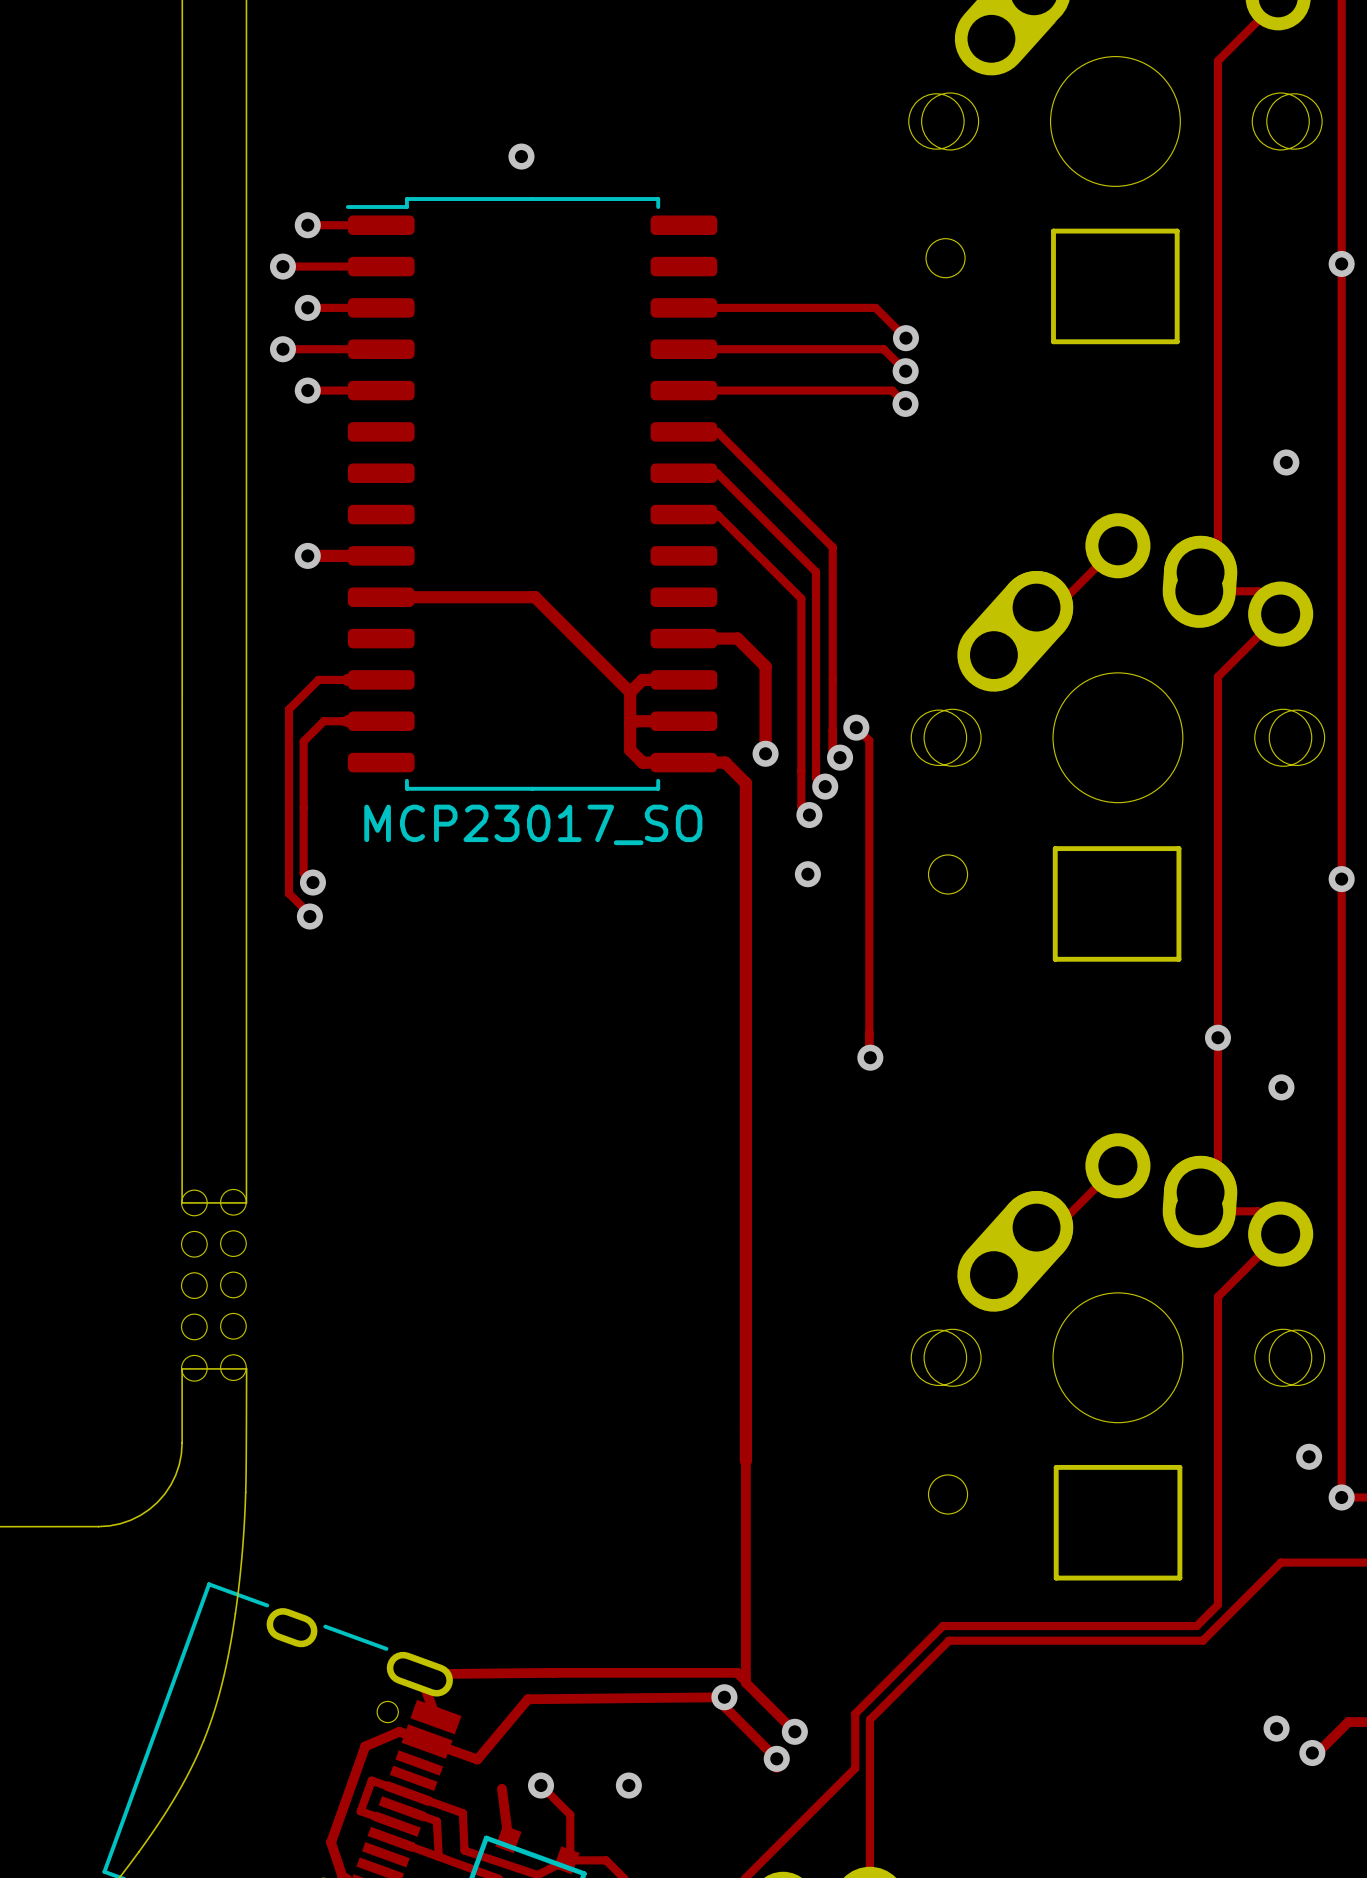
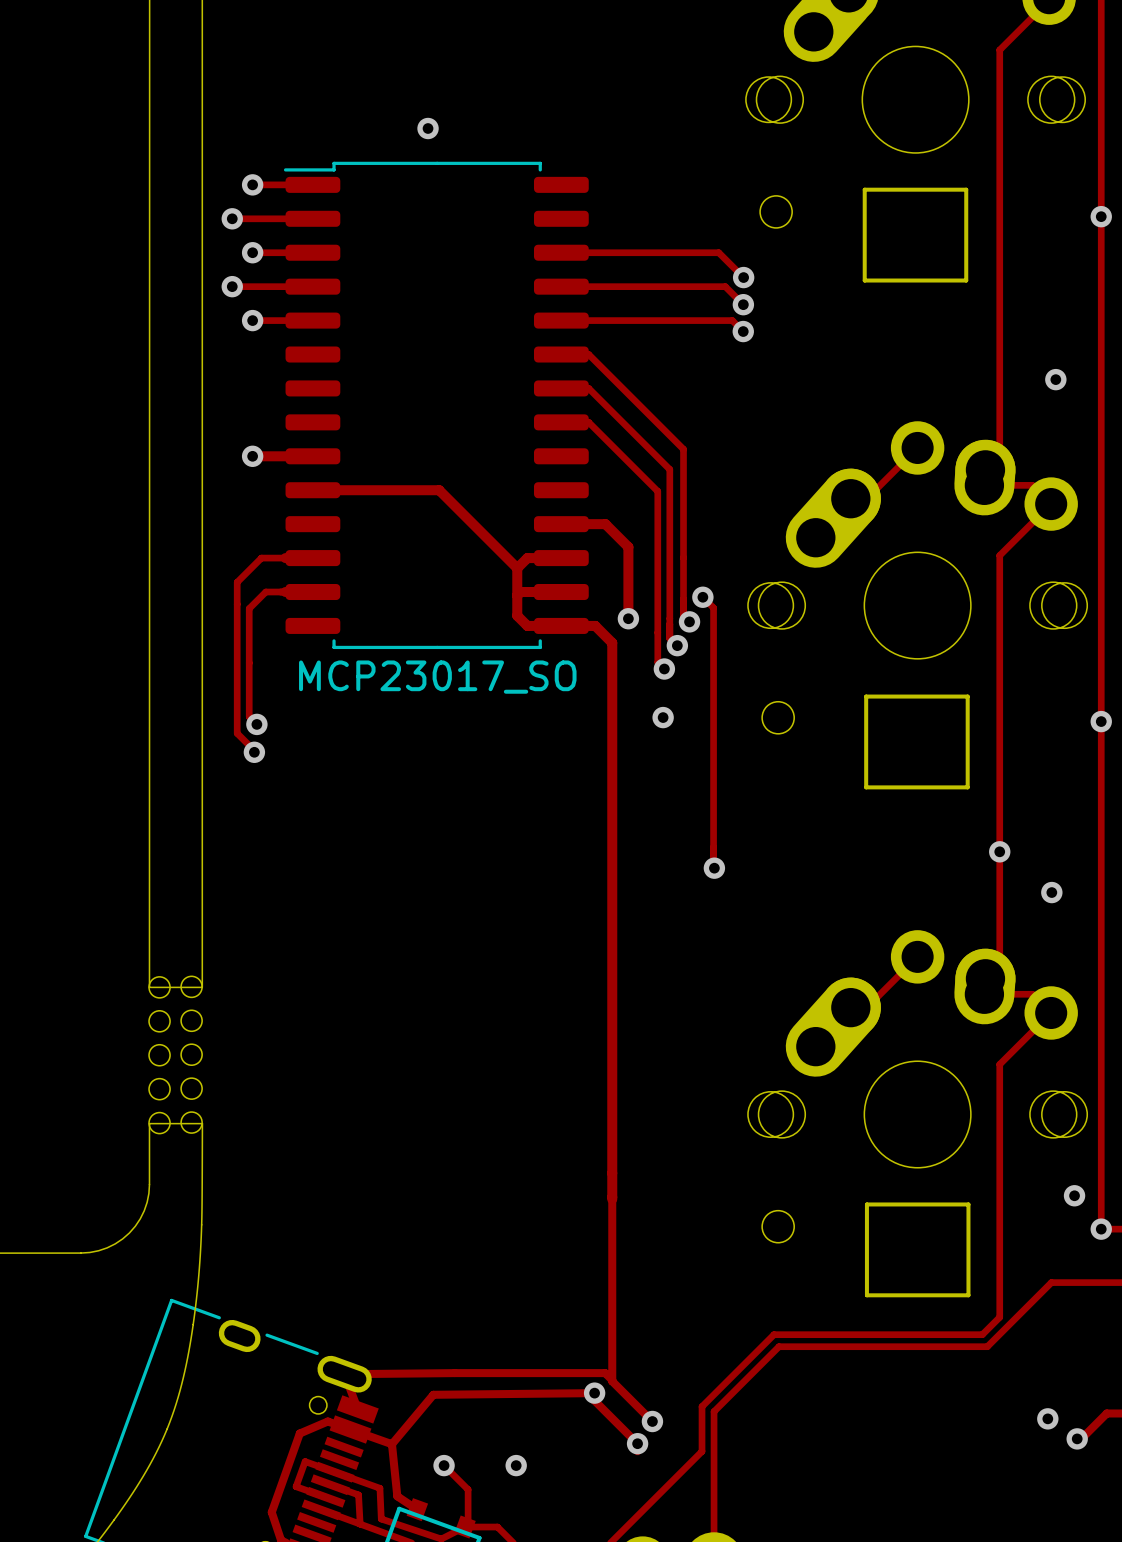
track: (501, 1788) (508, 1839) -> (391, 1444) (397, 1496) (417, 1509)

